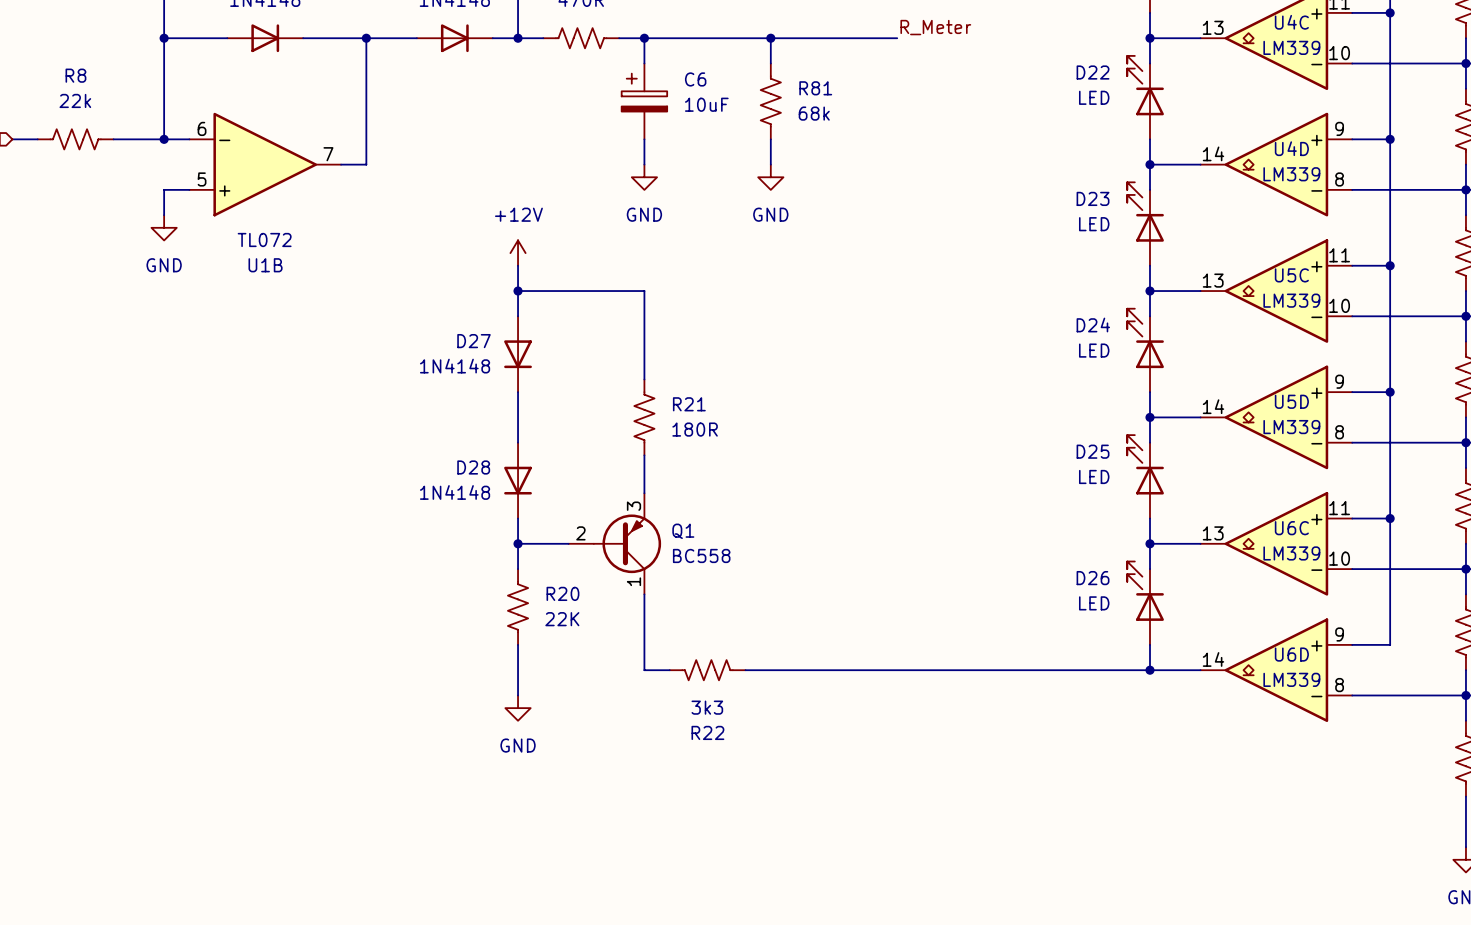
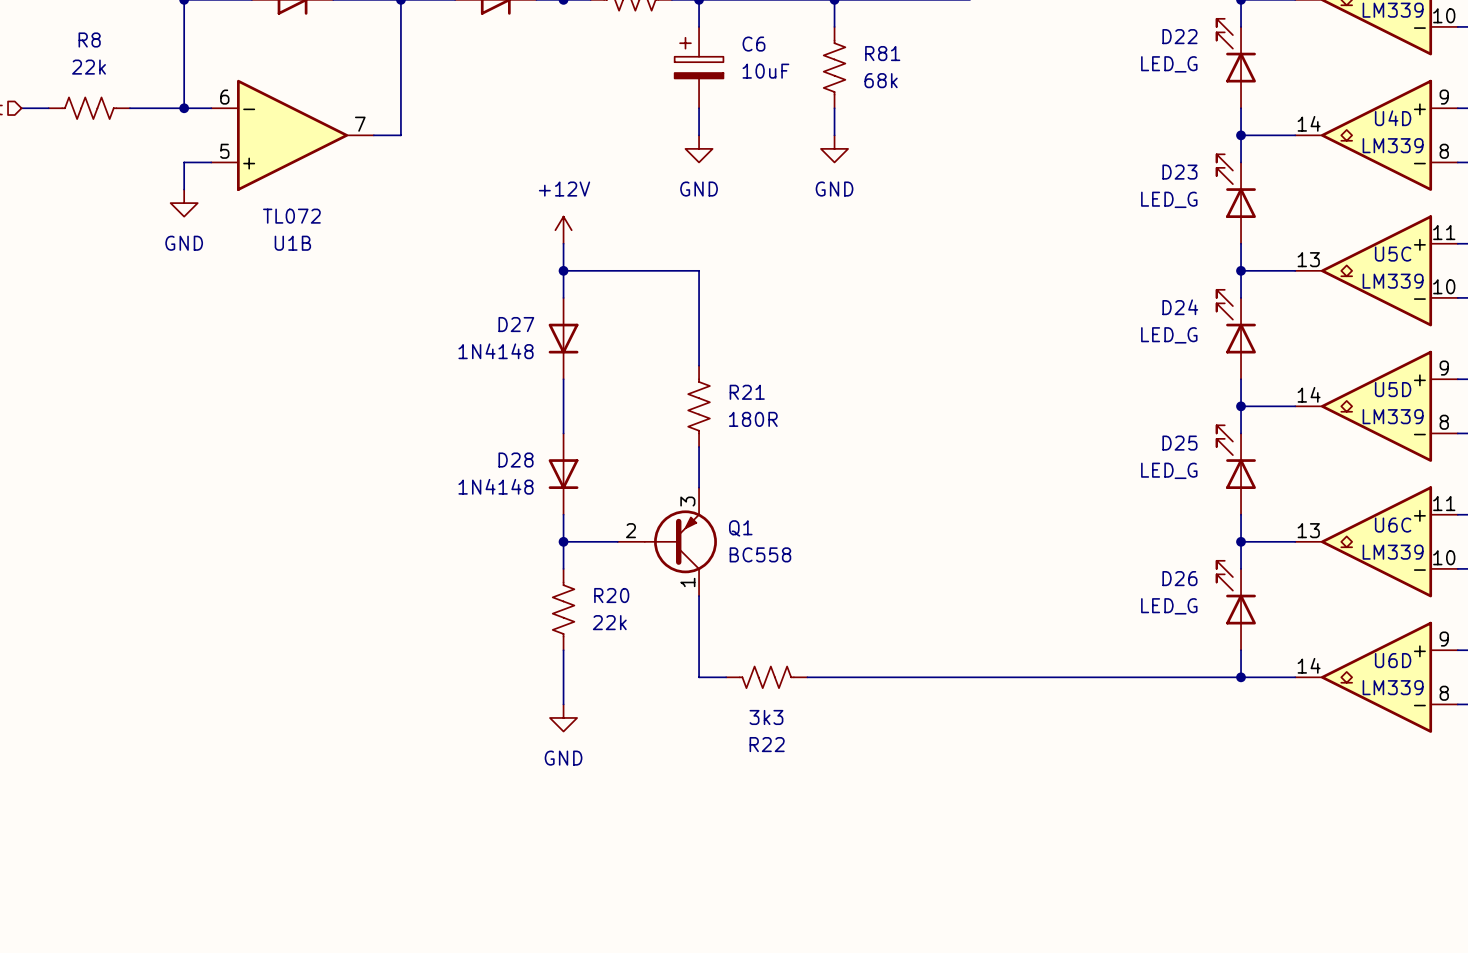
D22 value: LED (1094, 97) -> LED_G (1169, 64)
D23 value: LED (1094, 224) -> LED_G (1169, 199)
D24 value: LED (1094, 350) -> LED_G (1169, 335)
D25 value: LED (1094, 476) -> LED_G (1169, 470)
D26 value: LED (1094, 603) -> LED_G (1169, 606)
R20 value: 22K (562, 619) -> 22k (609, 622)

